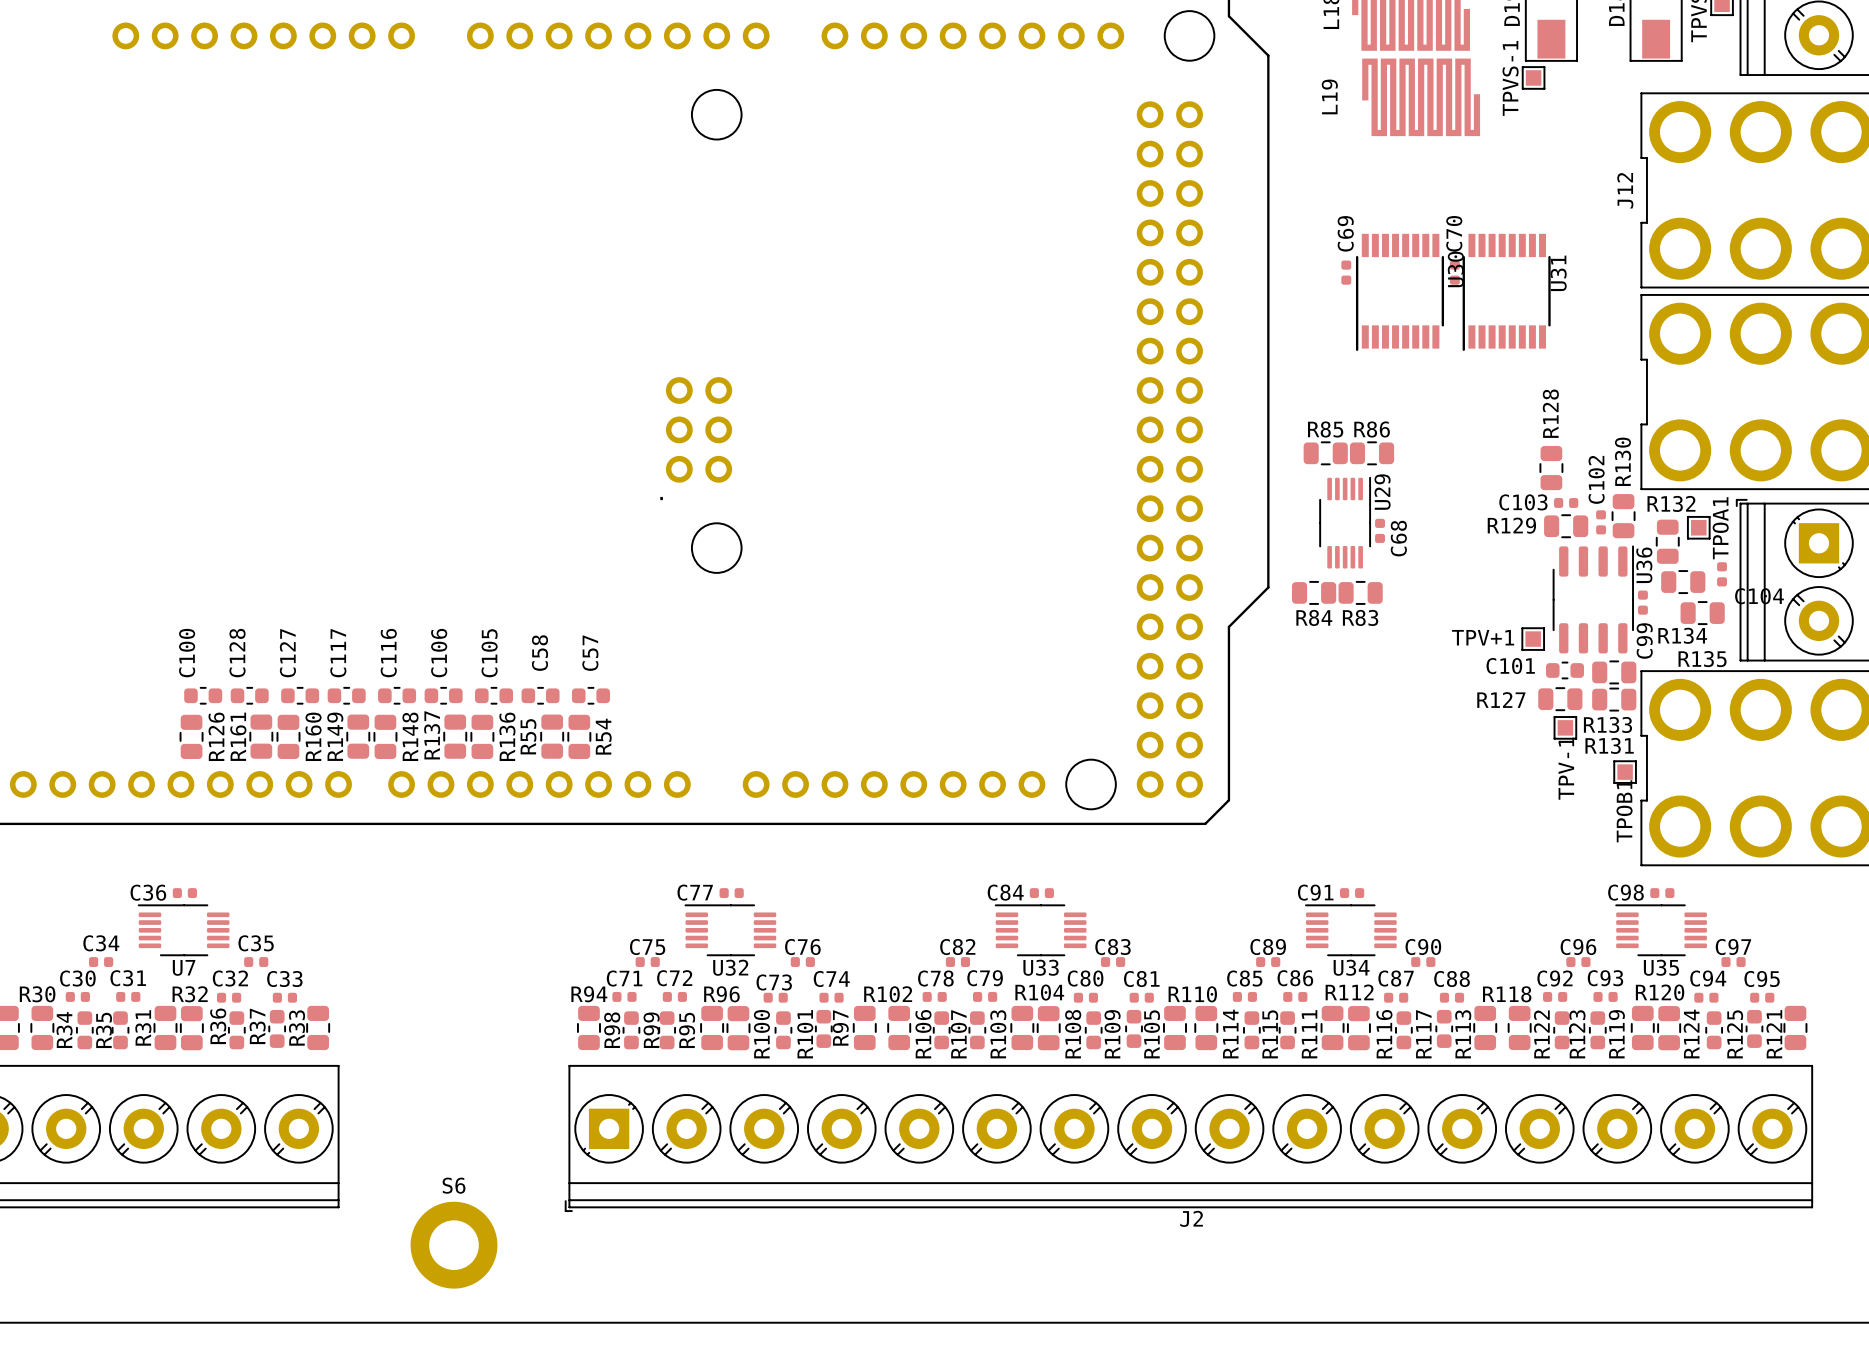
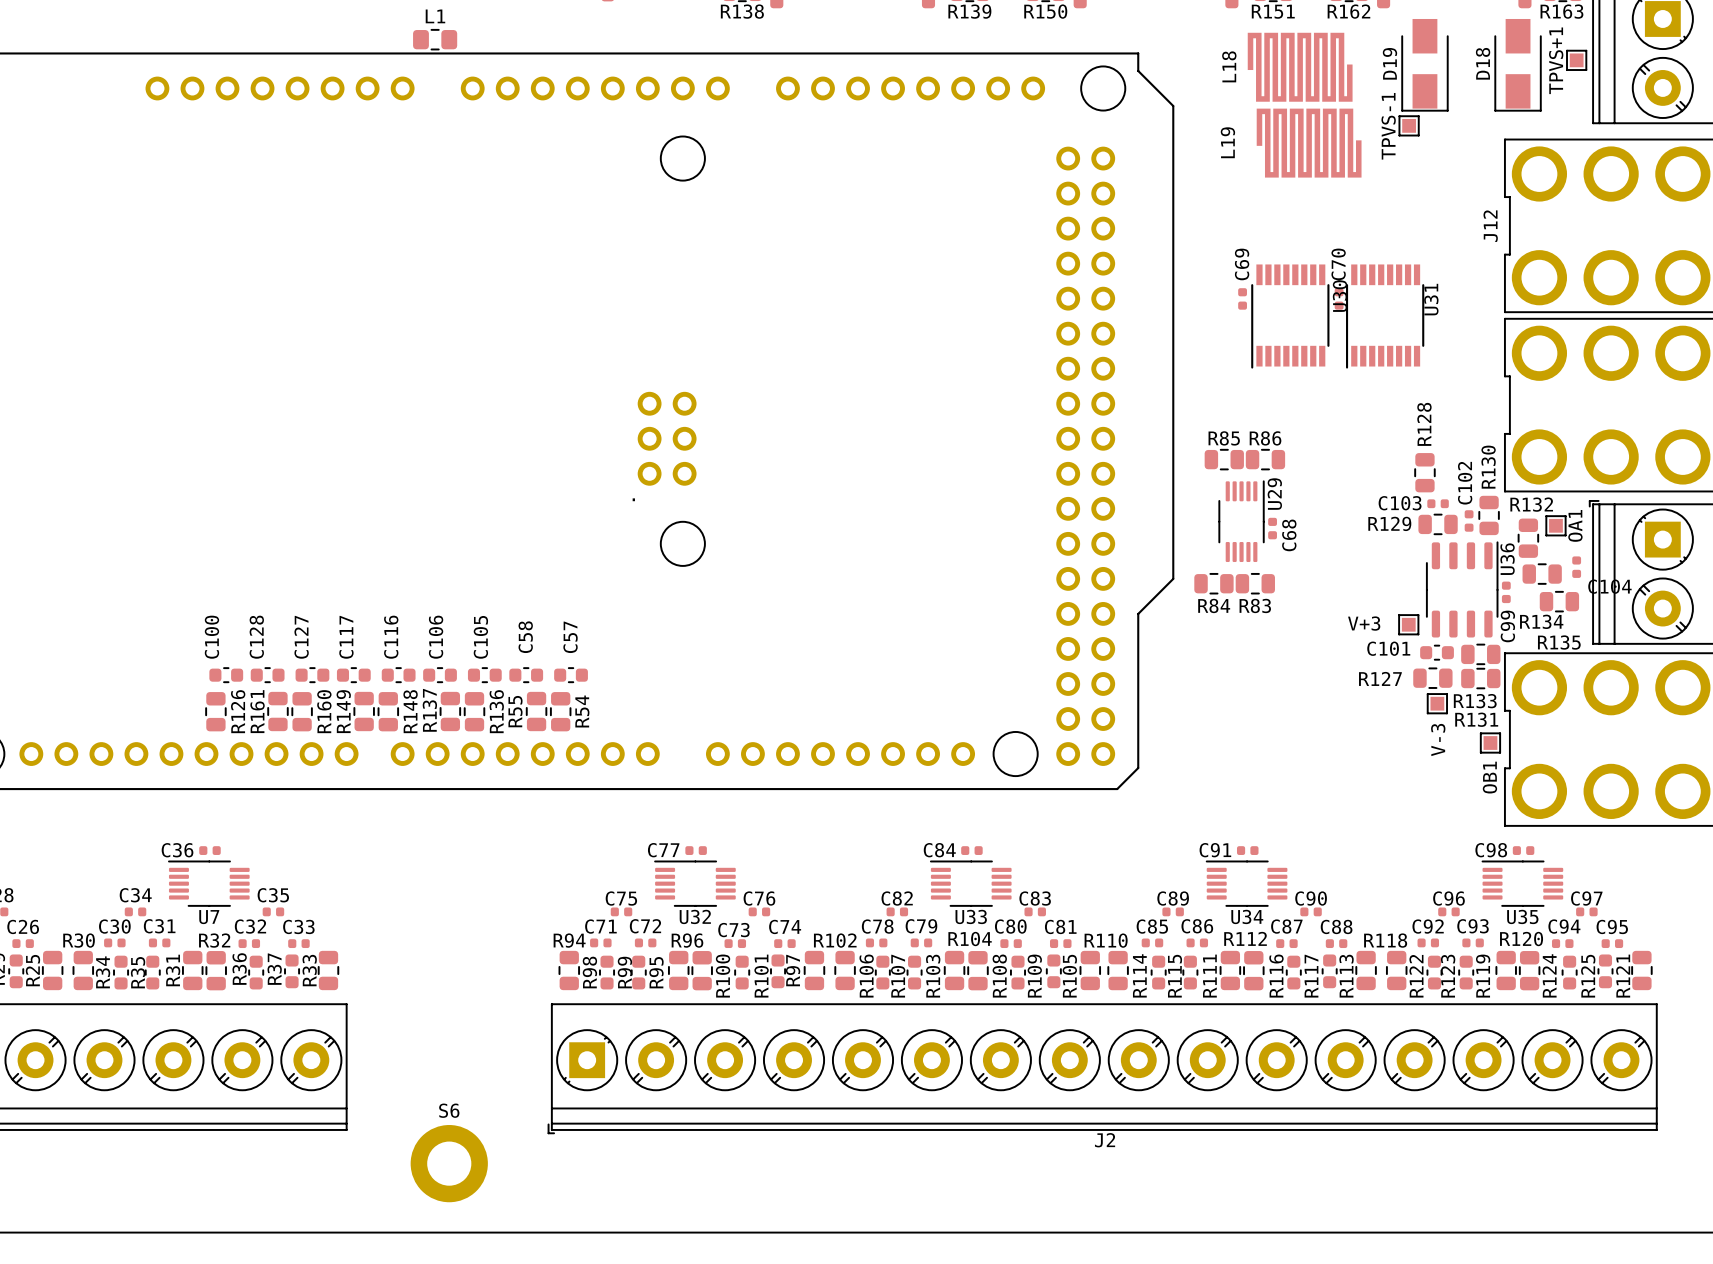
TPOA1 name: TPOA1 (1720, 528) -> OA1 (1575, 525)
TPV+1 name: TPV+1 (1483, 637) -> V+3 (1364, 623)
TPV-1 name: TPV-1 (1566, 768) -> V-3 (1438, 740)
TPOB1 name: TPOB1 (1624, 811) -> OB1 (1489, 777)

